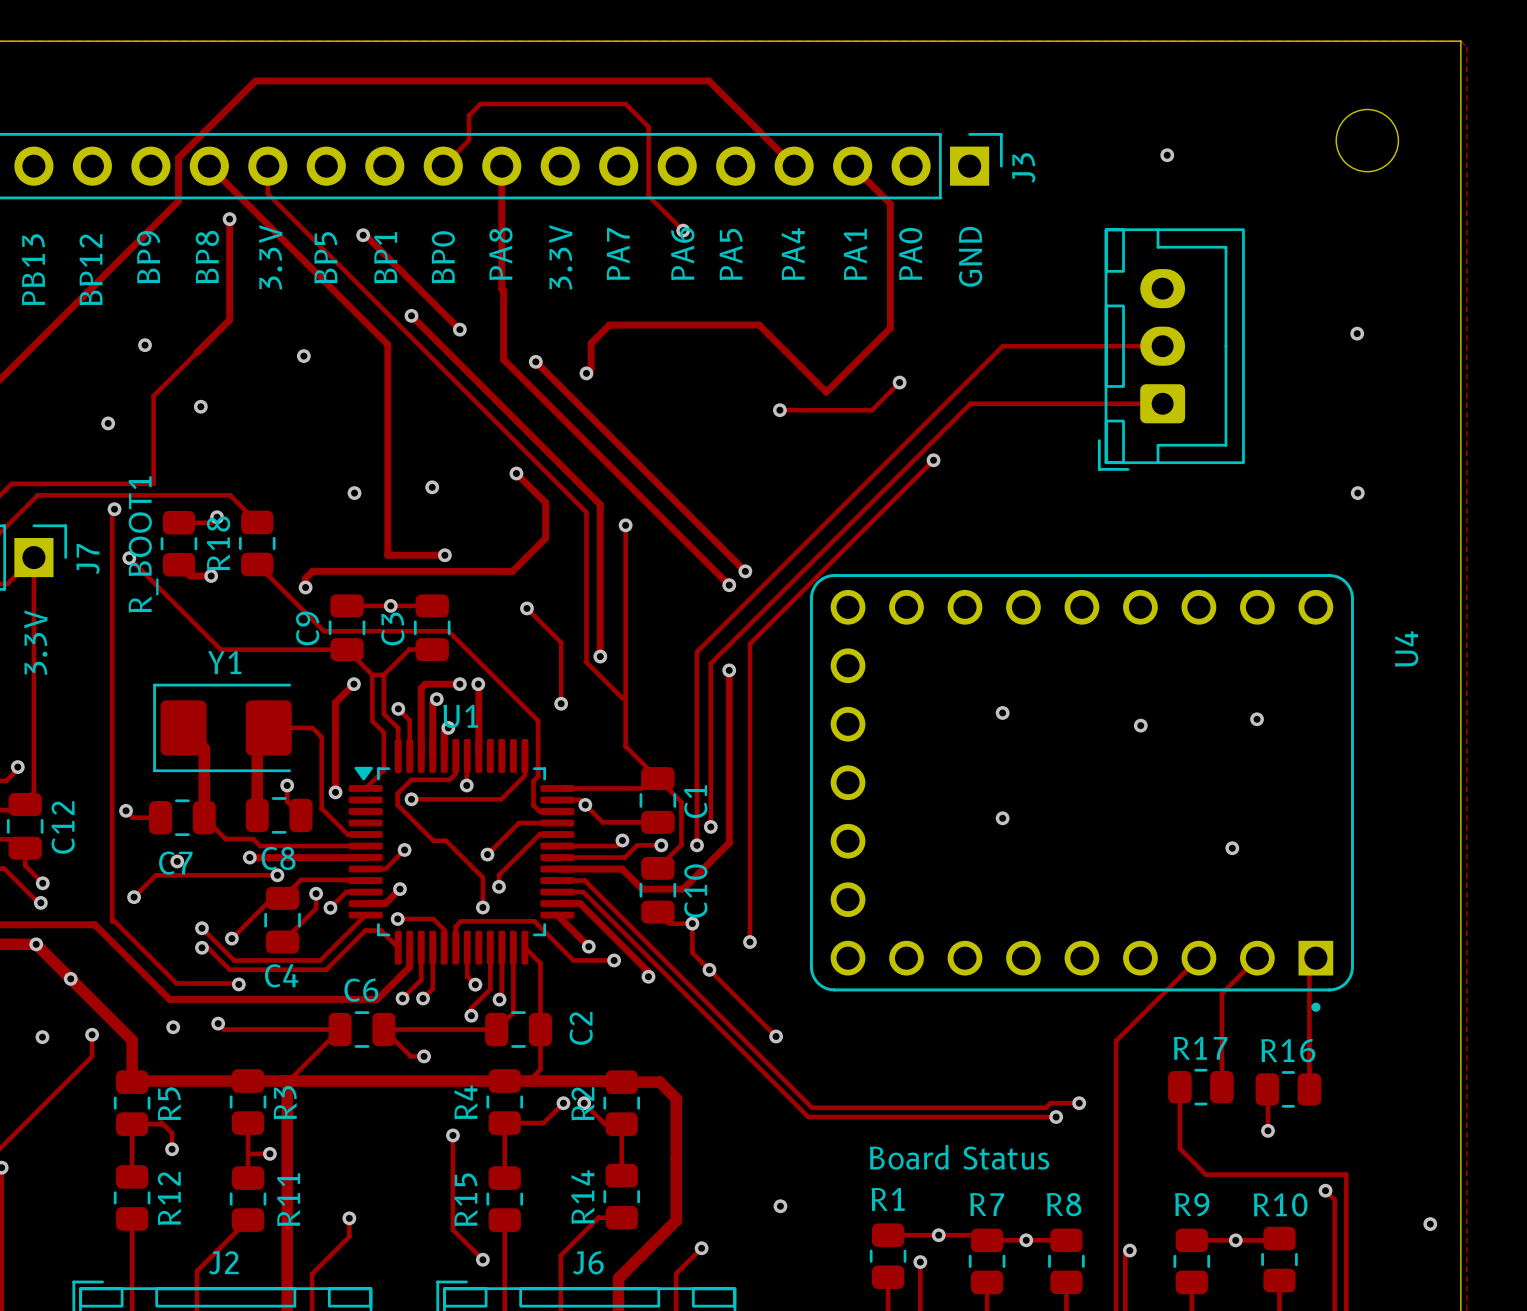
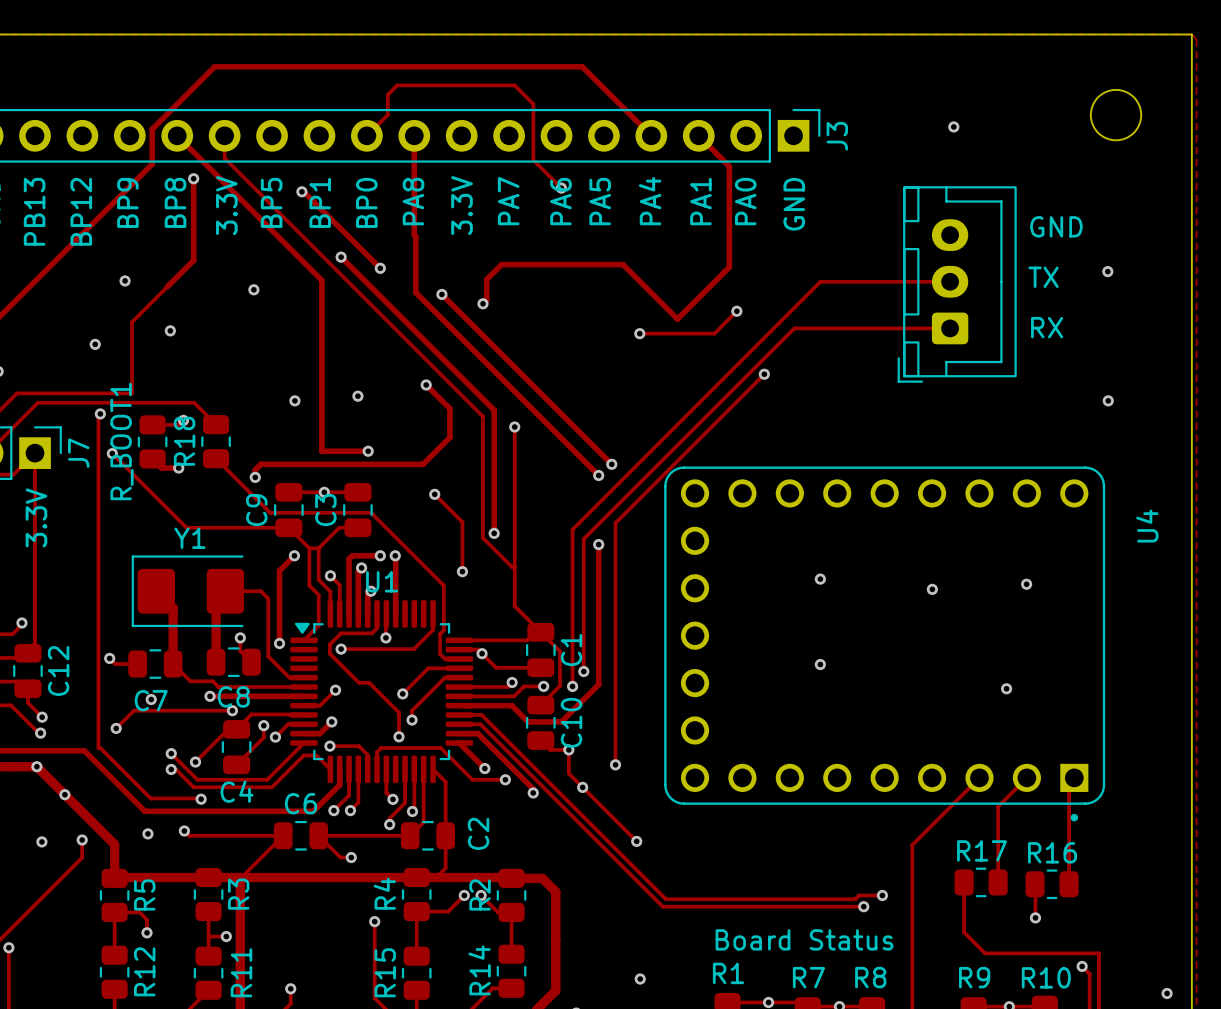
text: none -> GND (1056, 226)
text: none -> TX (1043, 277)
text: none -> RX (1047, 327)

